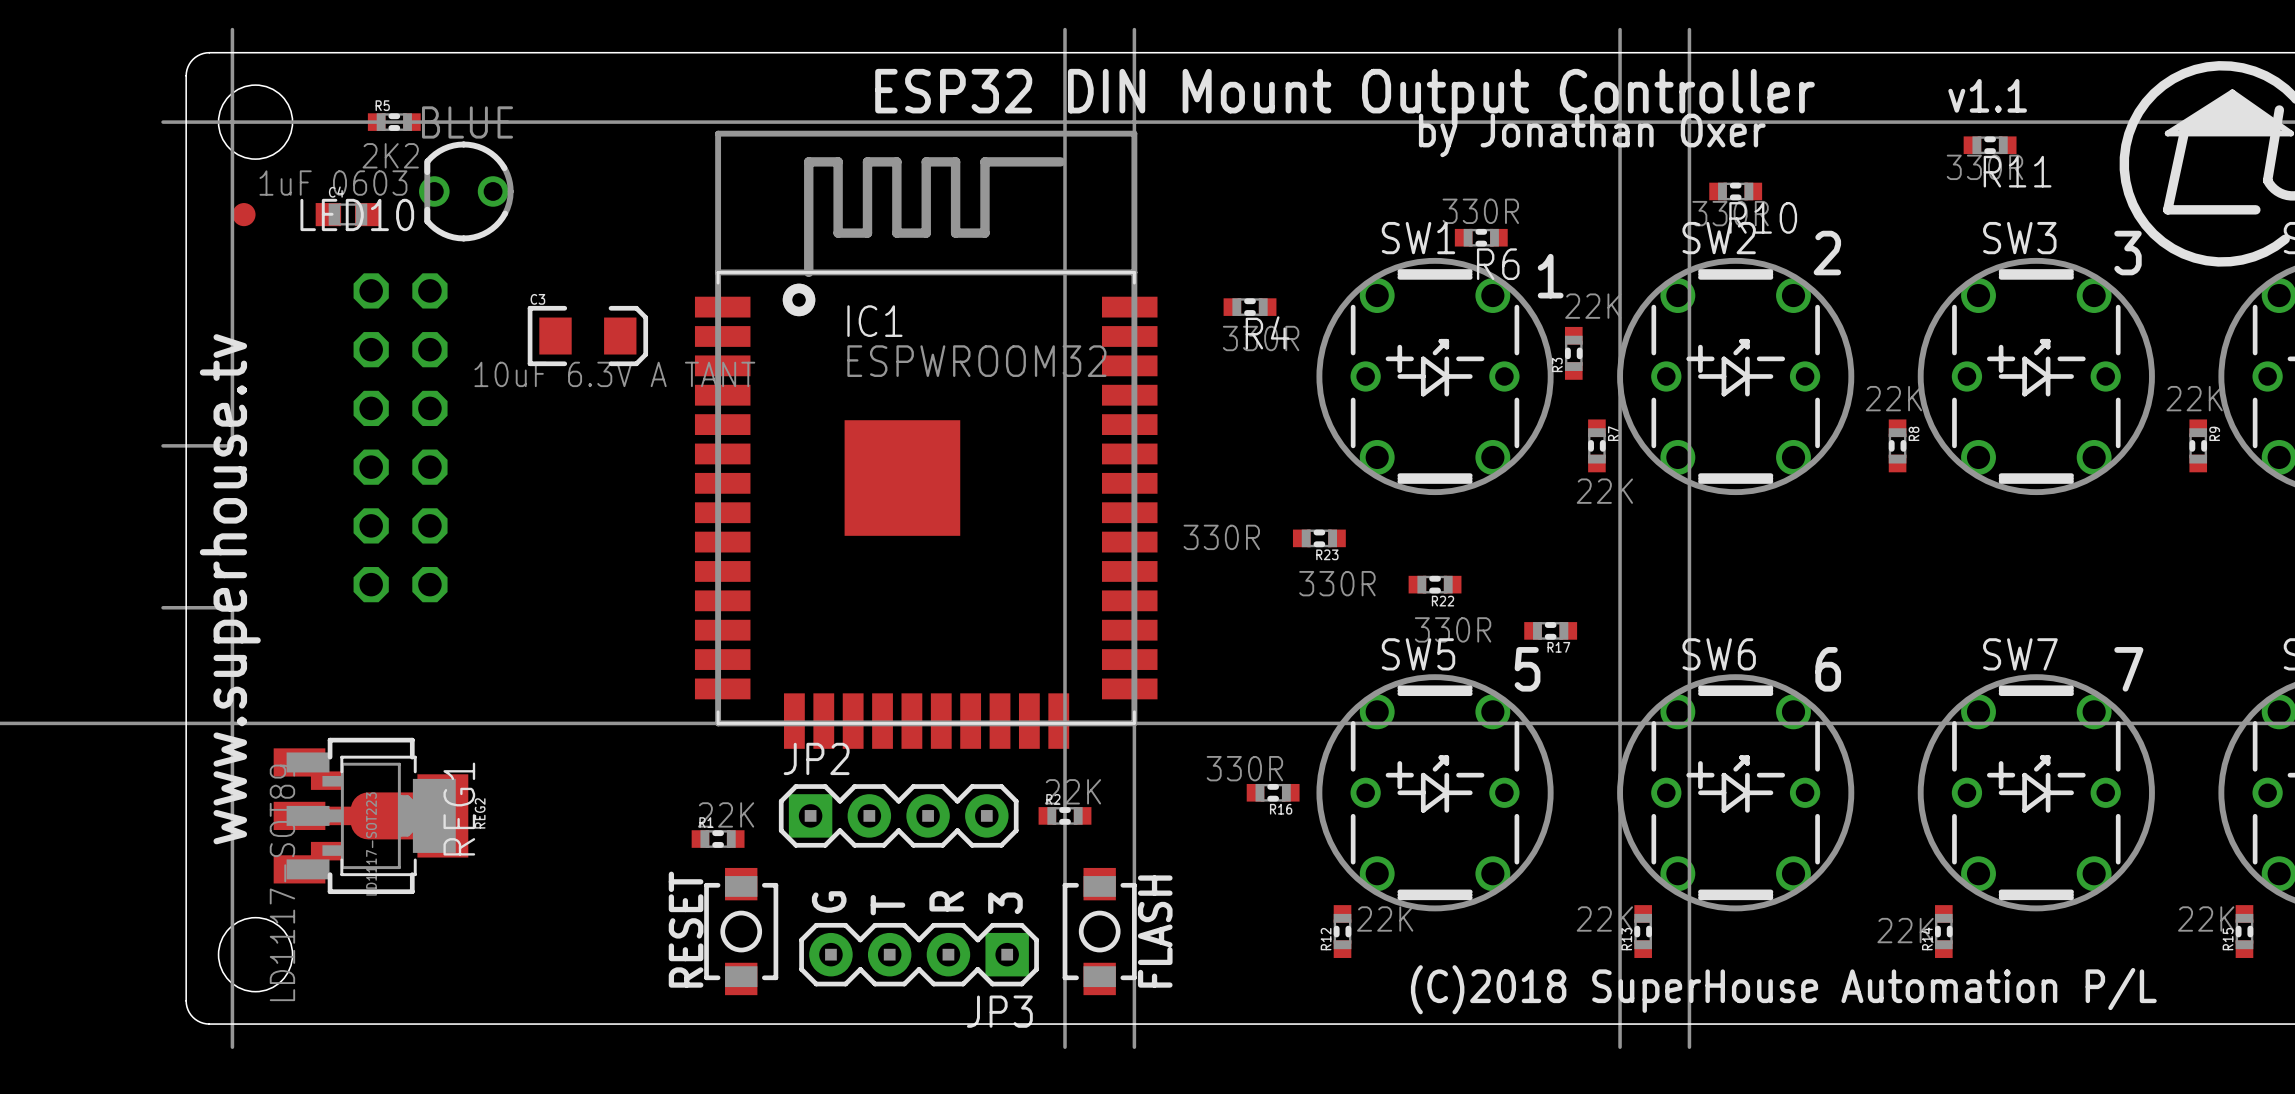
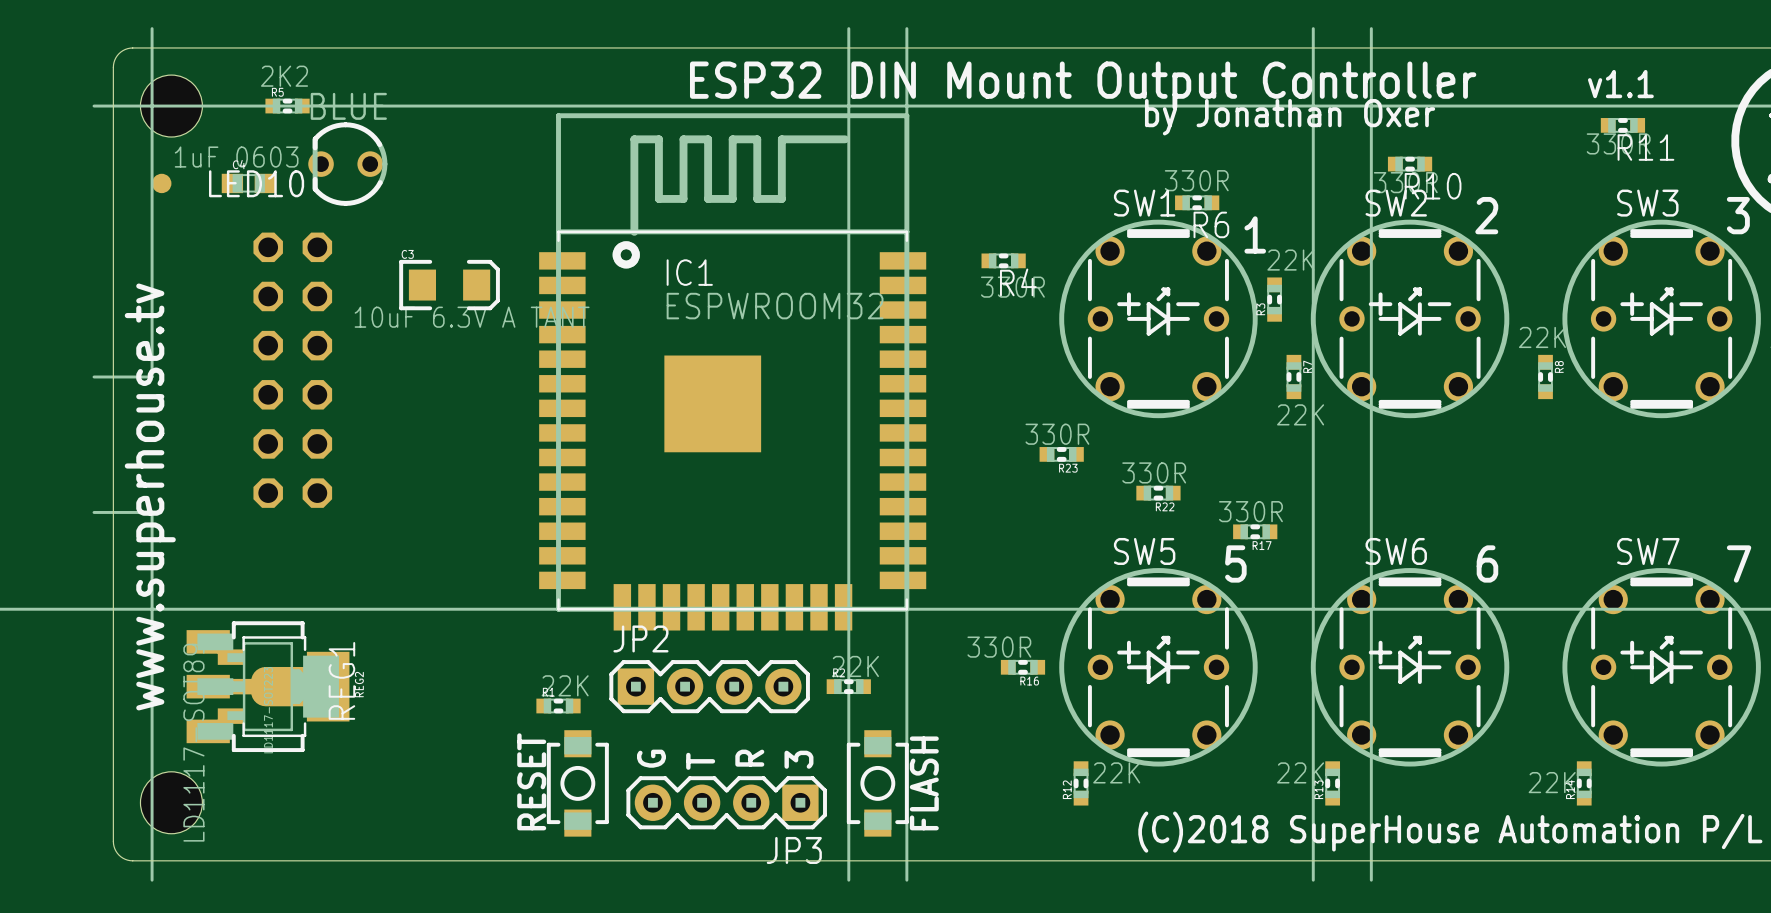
R5 value position: 2K2 (390, 155) -> 2K2 (284, 76)
R23 value position: 330R (1221, 537) -> 330R (1057, 434)
R22 value position: 330R (1337, 583) -> 330R (1154, 472)
R17 value position: 330R (1453, 629) -> 330R (1250, 511)

